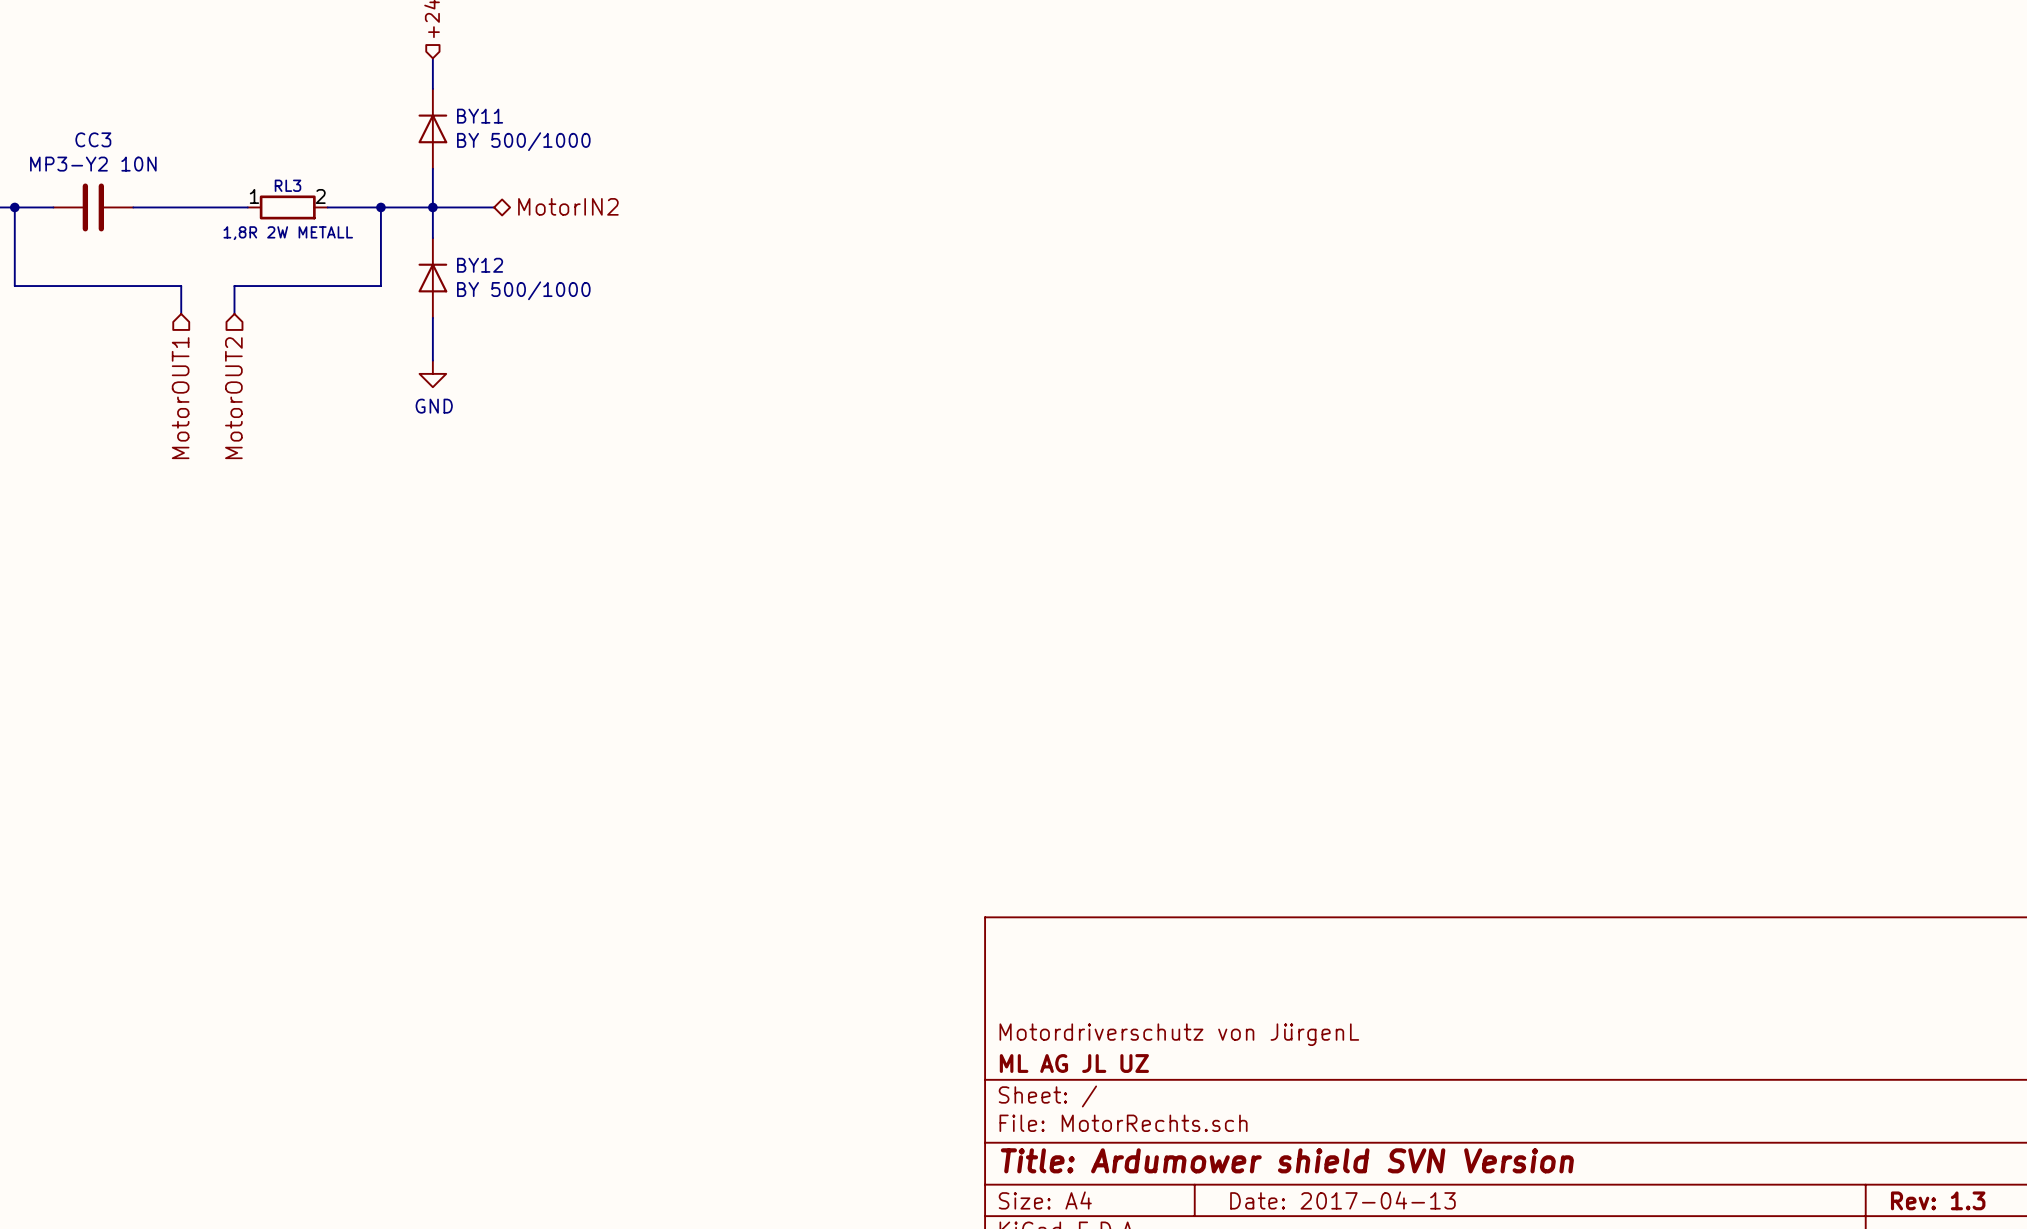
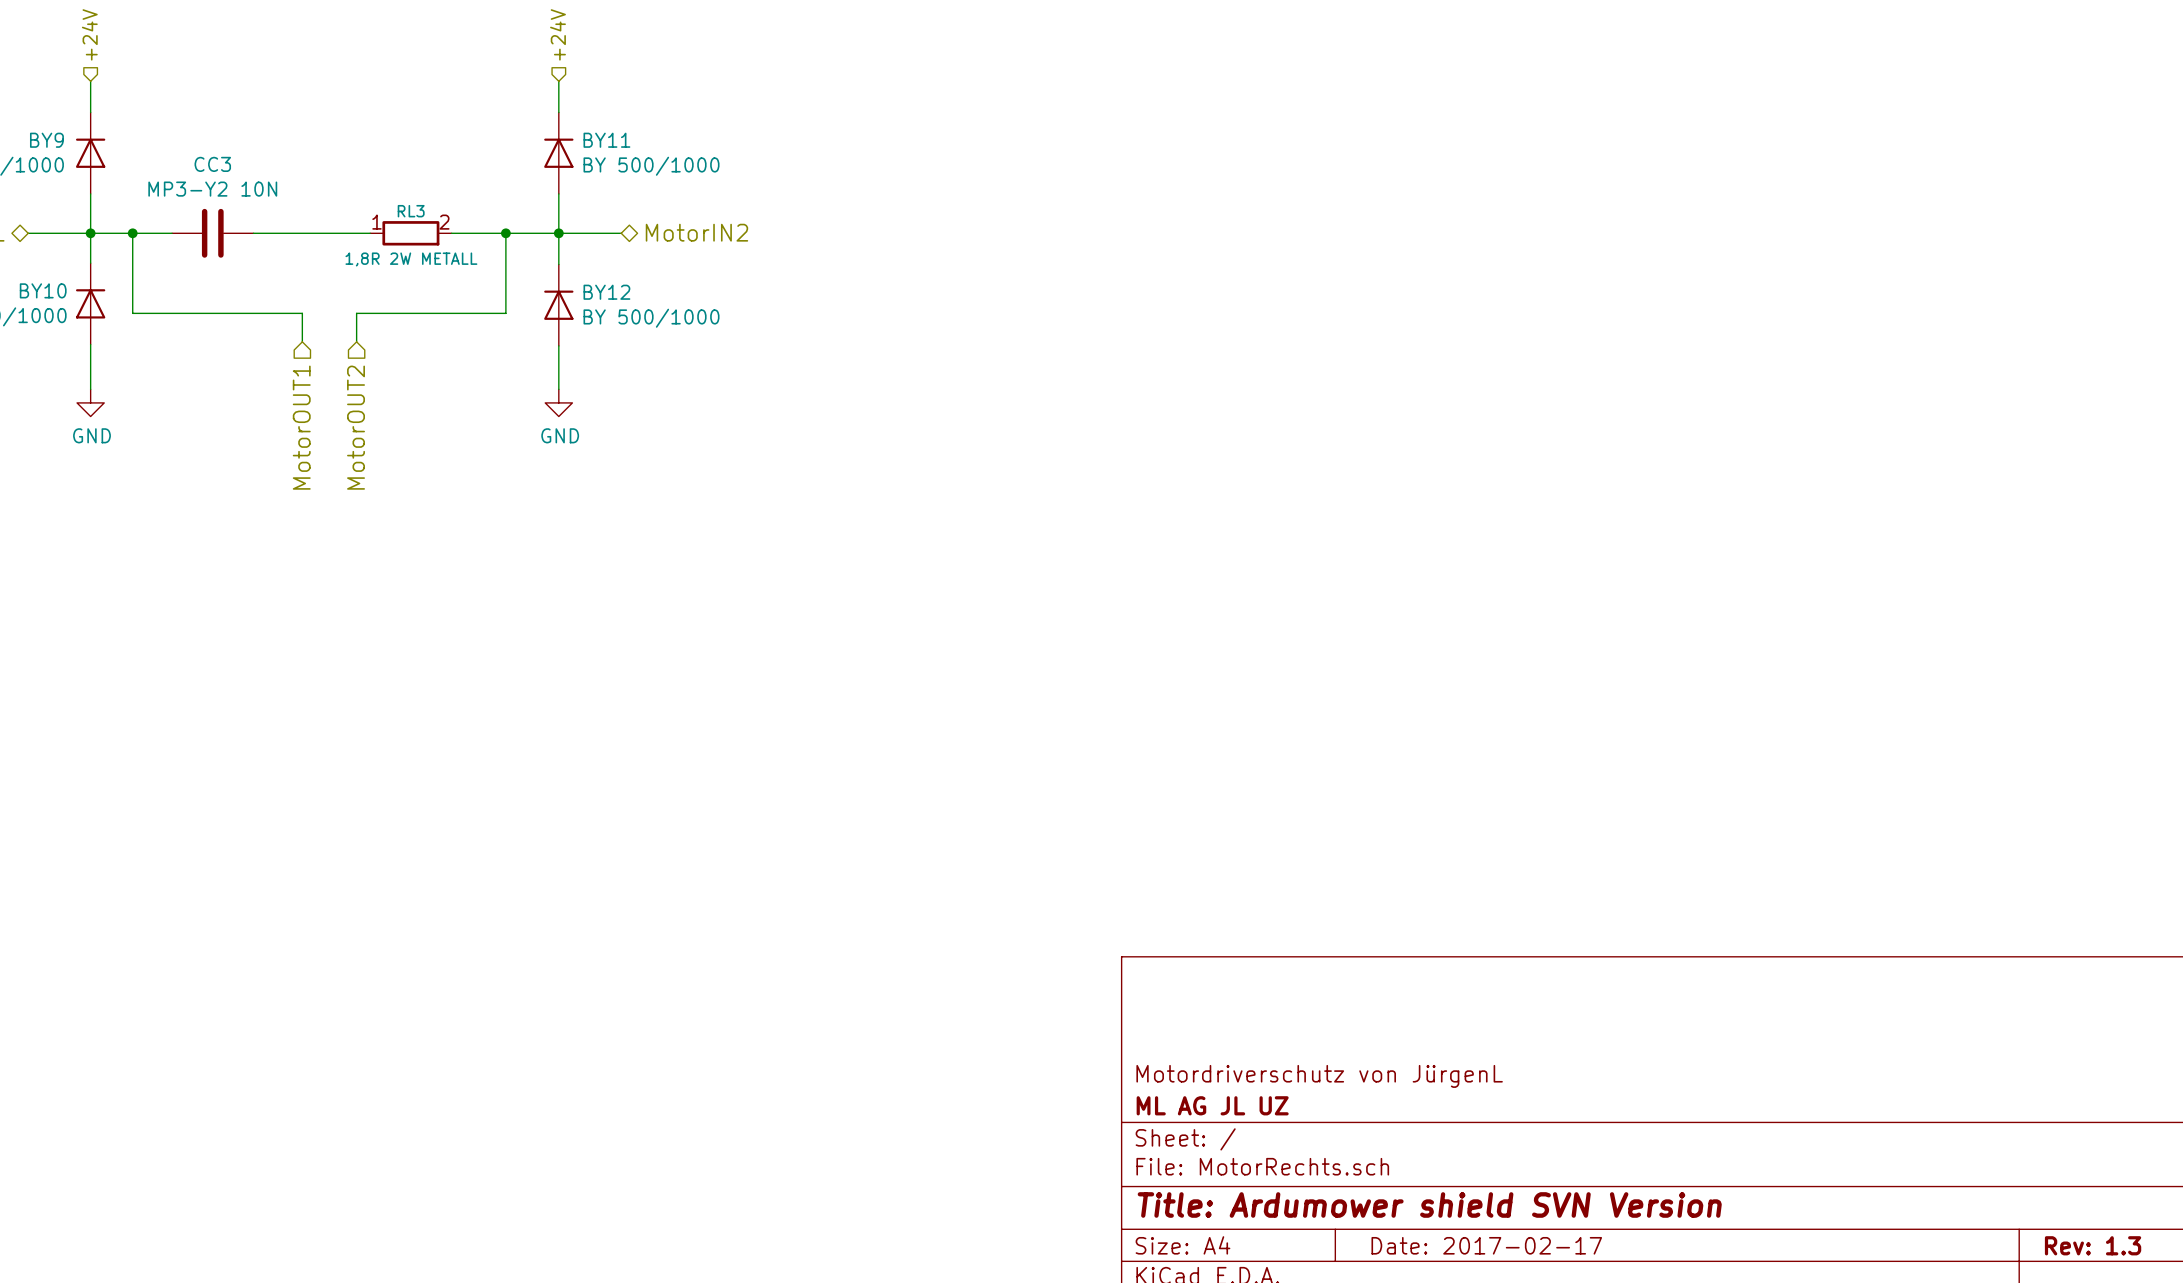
title block: Date: 2017-04-13 (1342, 1200) -> Date: 2017-02-17 (1486, 1245)

